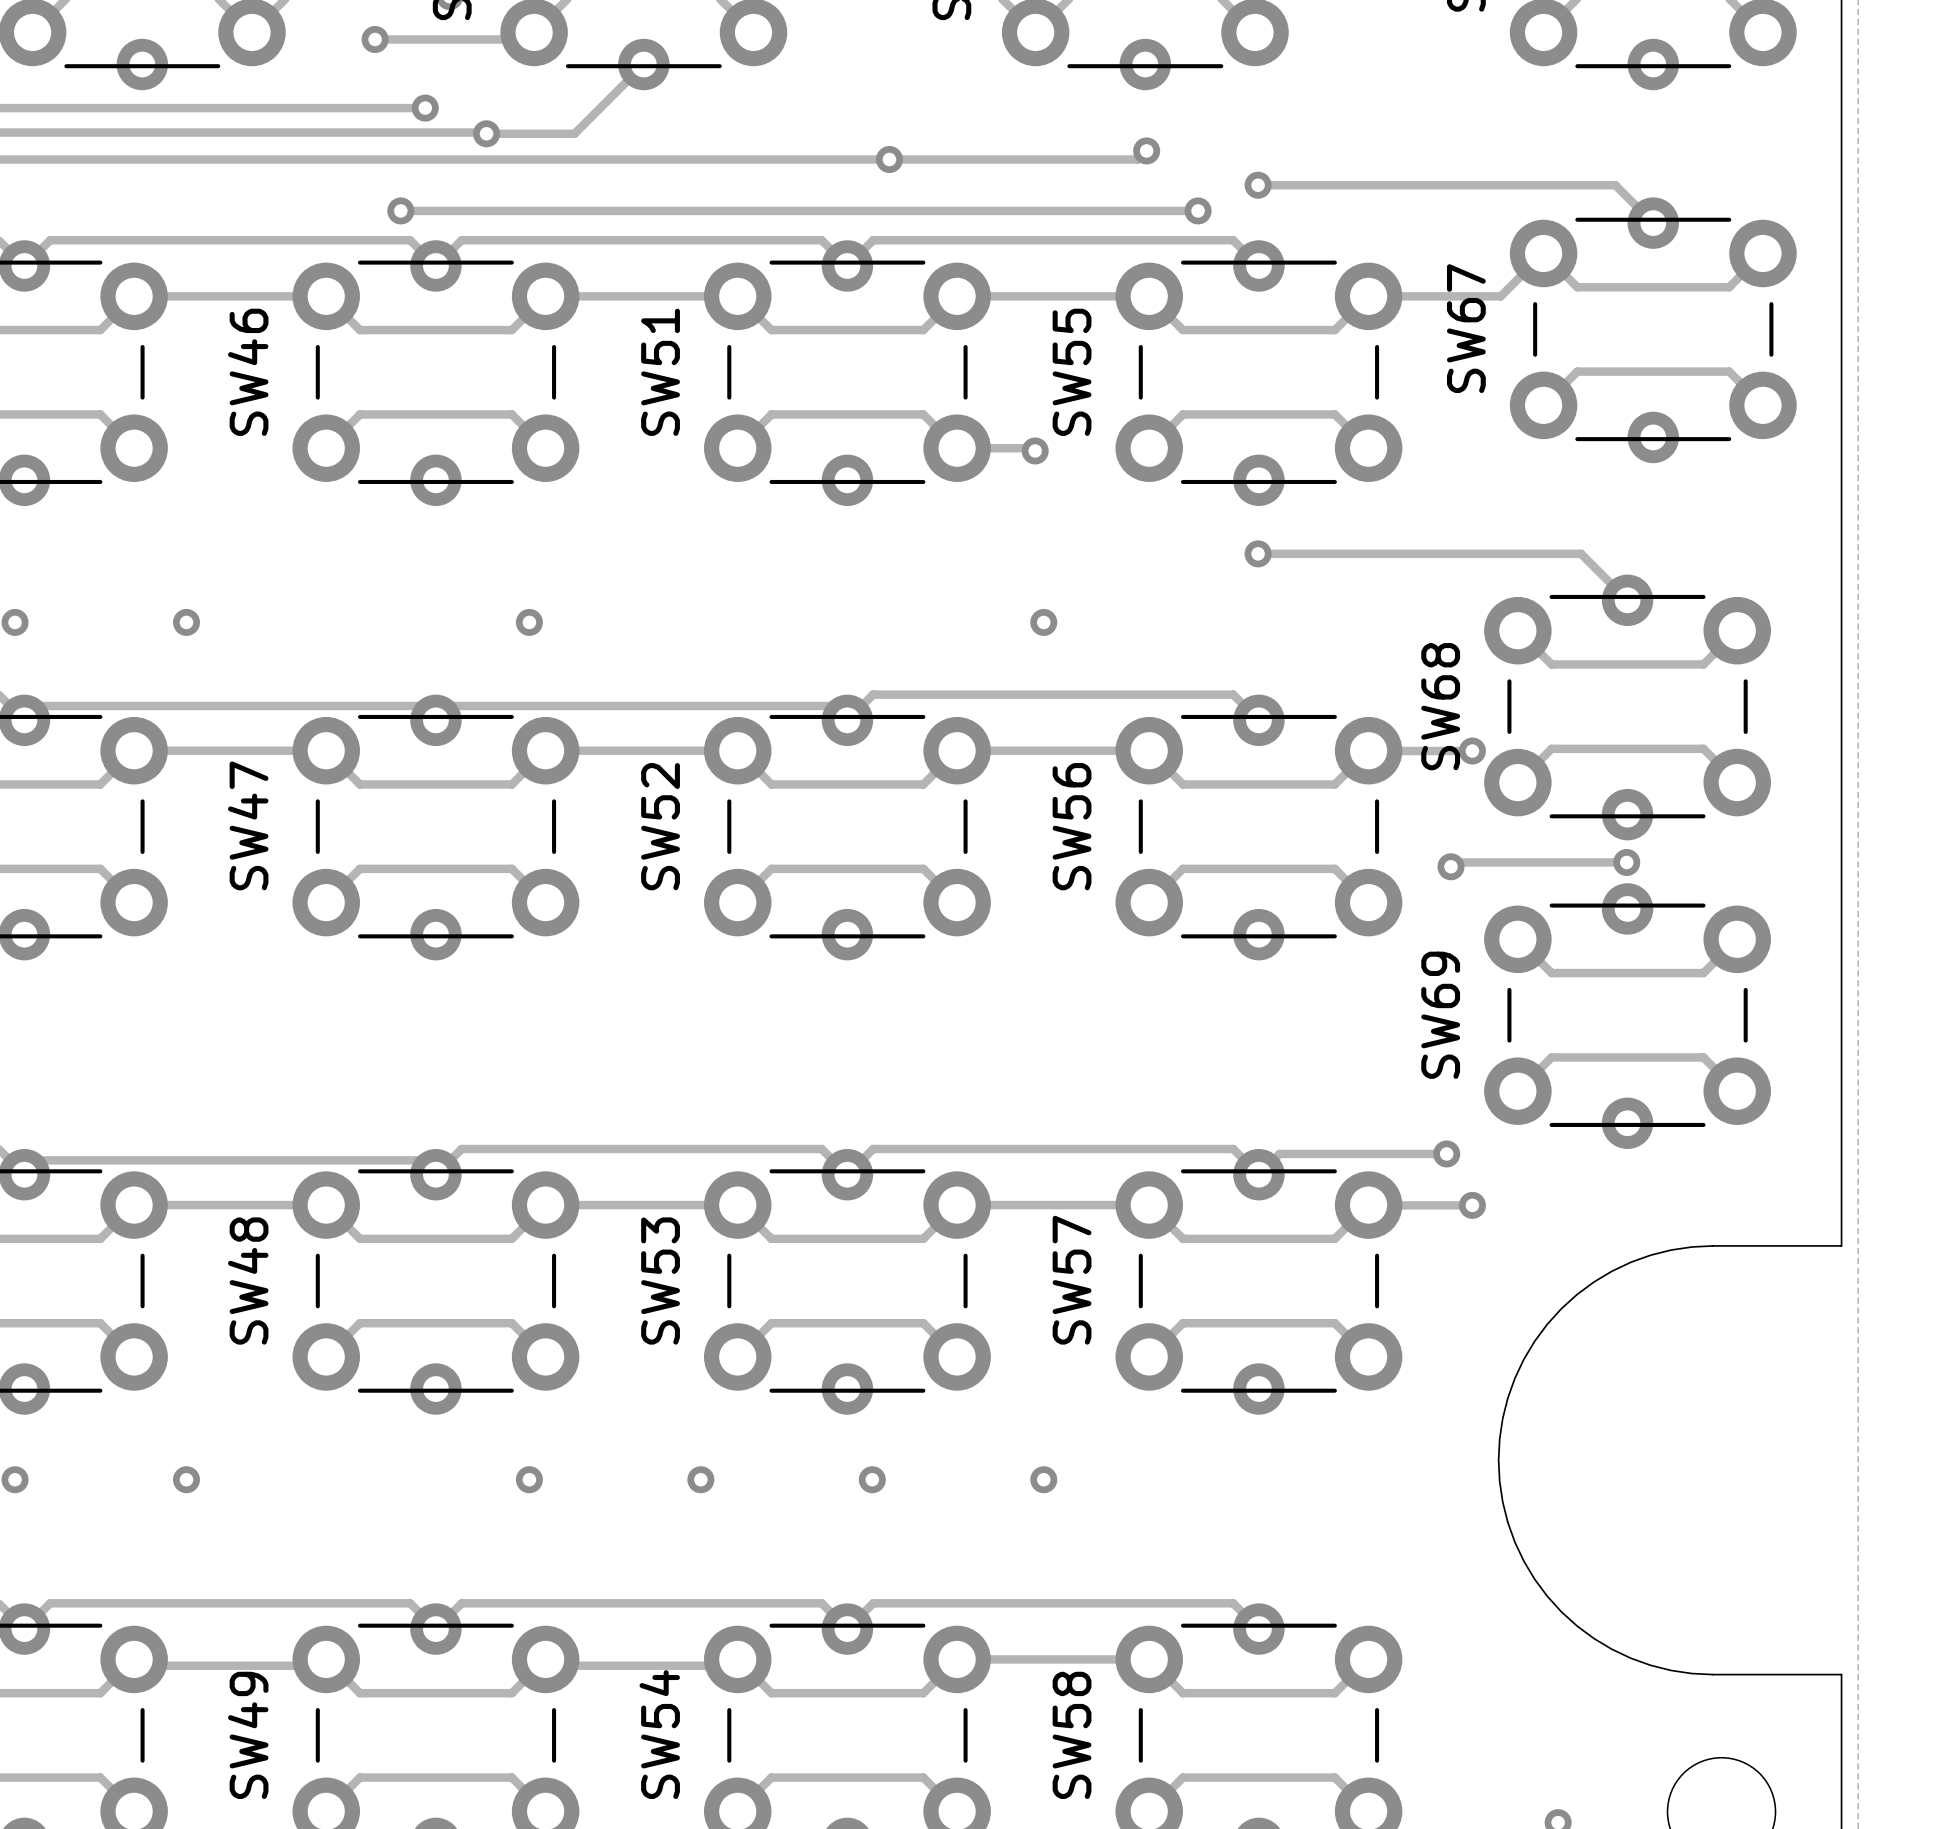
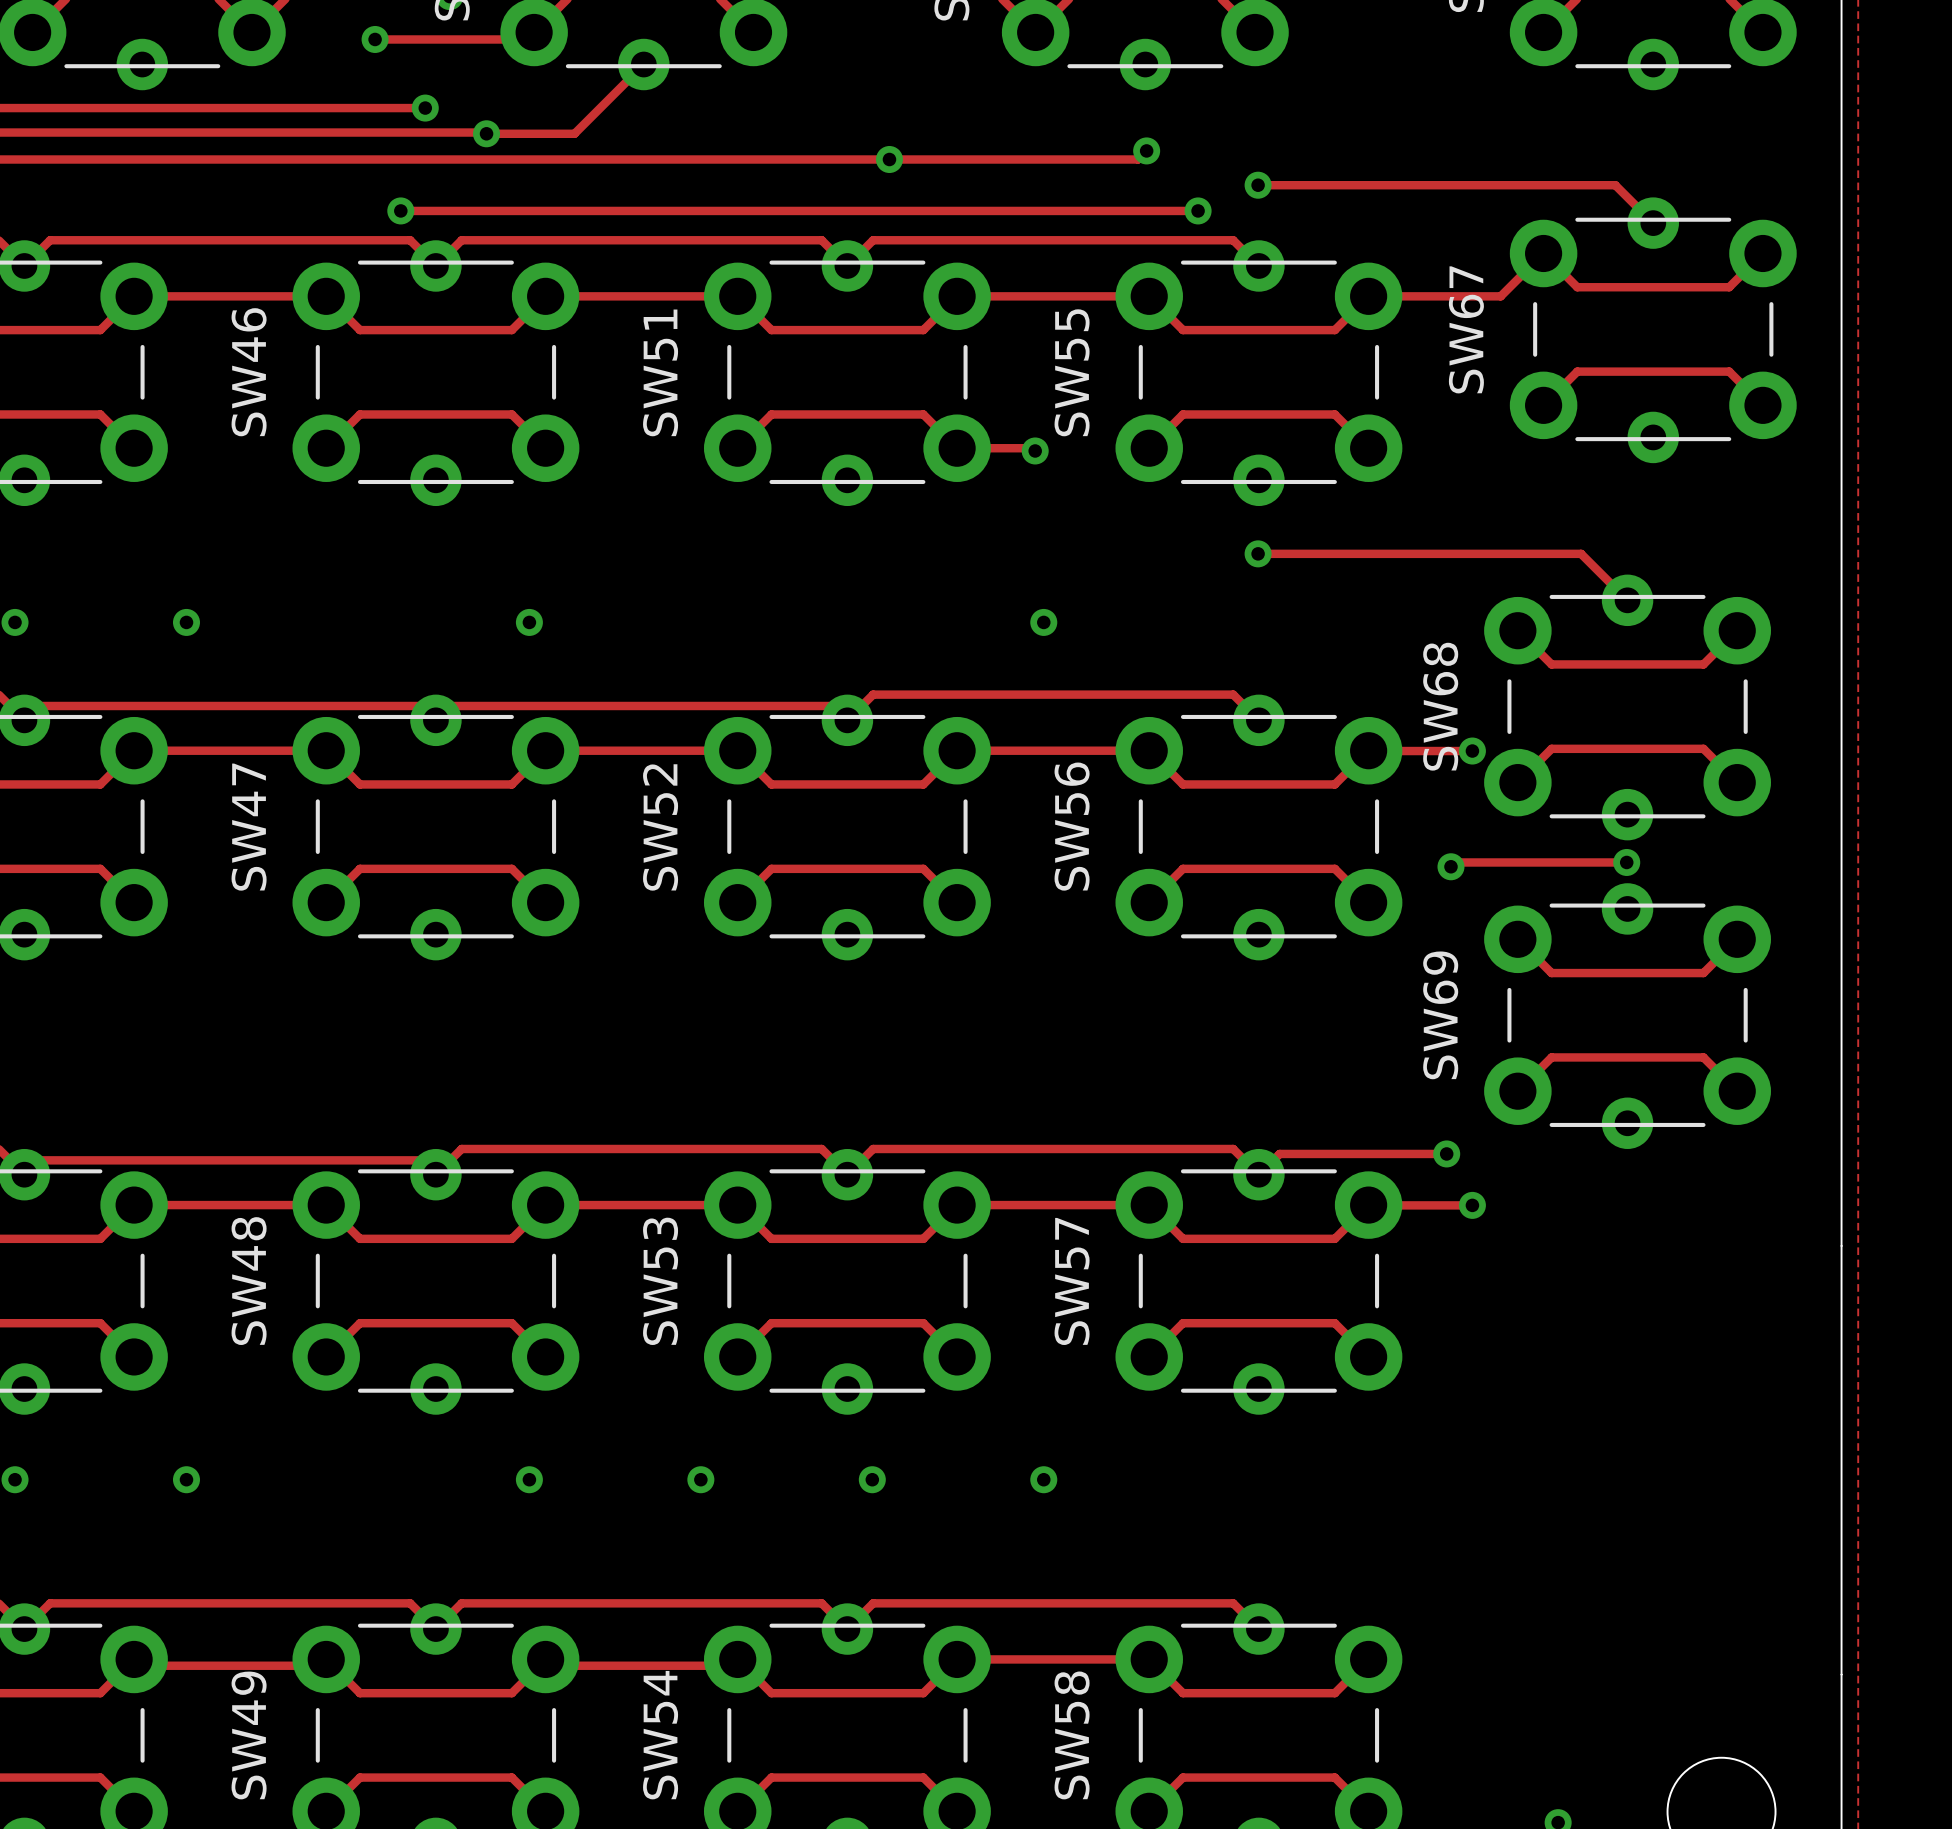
board edge: (1841, 1245) (1691, 1246) (1650, 1255) (1611, 1271) (1593, 1282) (1561, 1308) (1534, 1341) (1523, 1359) (1507, 1398) (1499, 1439) (1498, 1460) (1499, 1481) (1507, 1522) (1523, 1561) (1534, 1579) (1561, 1611) (1593, 1638) (1611, 1649) (1650, 1665) (1691, 1673) (1841, 1674) -> (1841, 1245) (1841, 1674)

